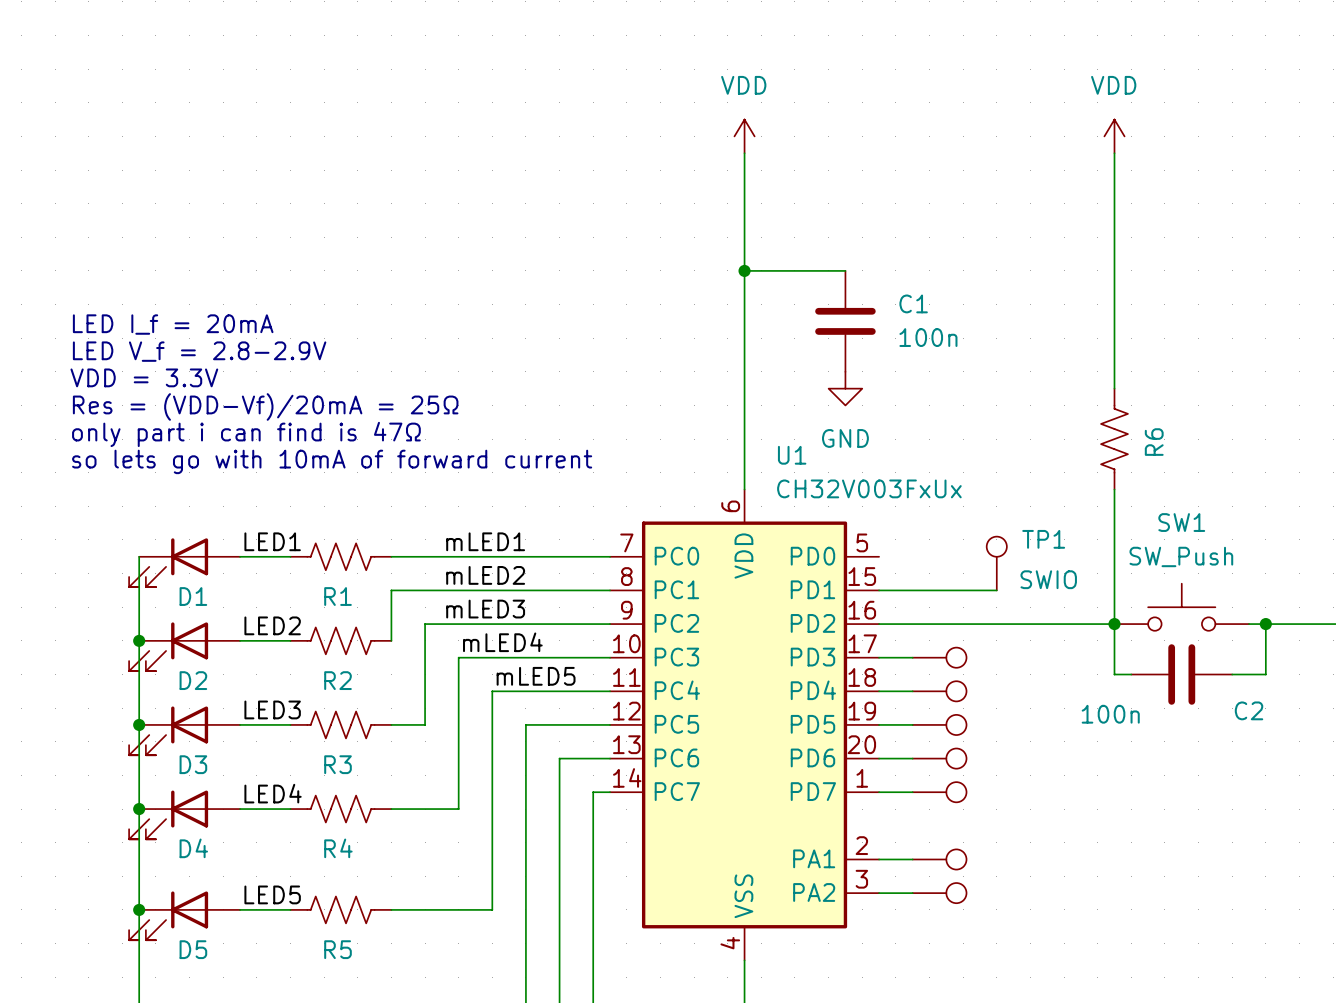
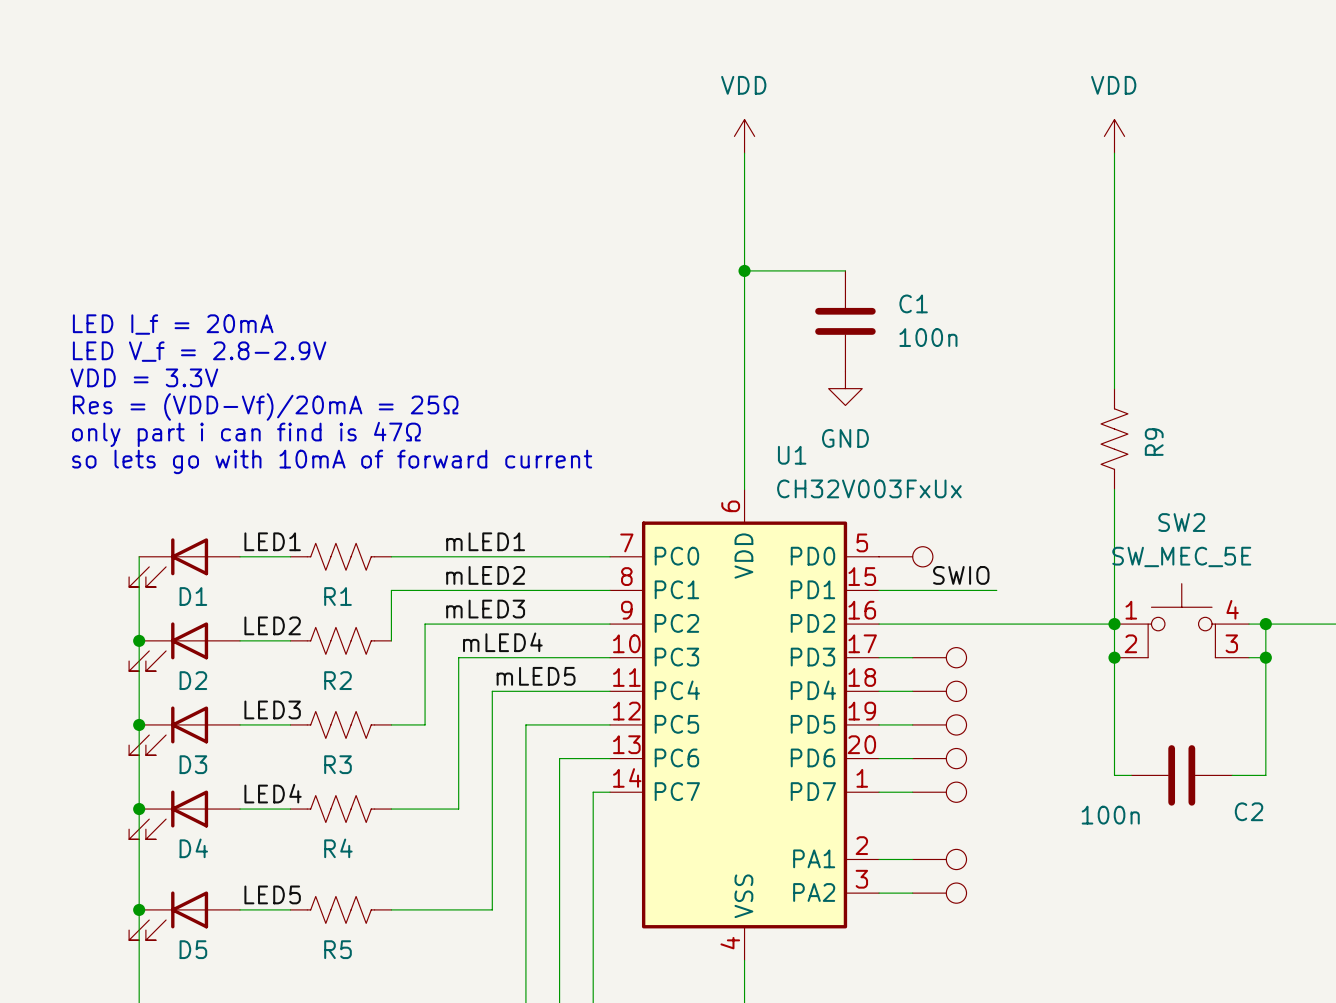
R6 name: R6 (1154, 442) -> R9 (1154, 442)
part: none -> (905, 556)
TP1: SWIO (996, 563) -> none
label: none -> SWIO (961, 575)
SW1: SW_Push (1181, 607) -> none
SW2: none -> SW_MEC_5E (1181, 620)
junction: none -> (1114, 657)
wire: none -> (1249, 657) (1265, 657)
junction: none -> (1265, 657)
wire: (1114, 674) (1131, 674) -> (1114, 674) (1114, 775) (1131, 775)
C2 position: (1181, 674) -> (1181, 775)
wire: (1232, 674) (1265, 674) -> (1232, 775) (1265, 775) (1265, 674)

